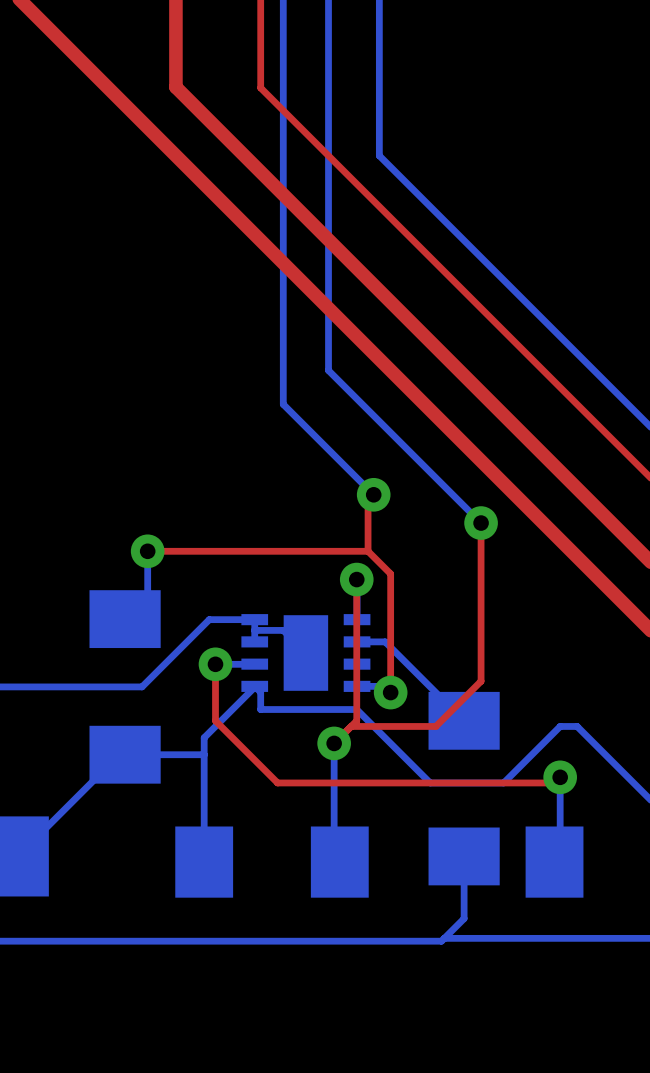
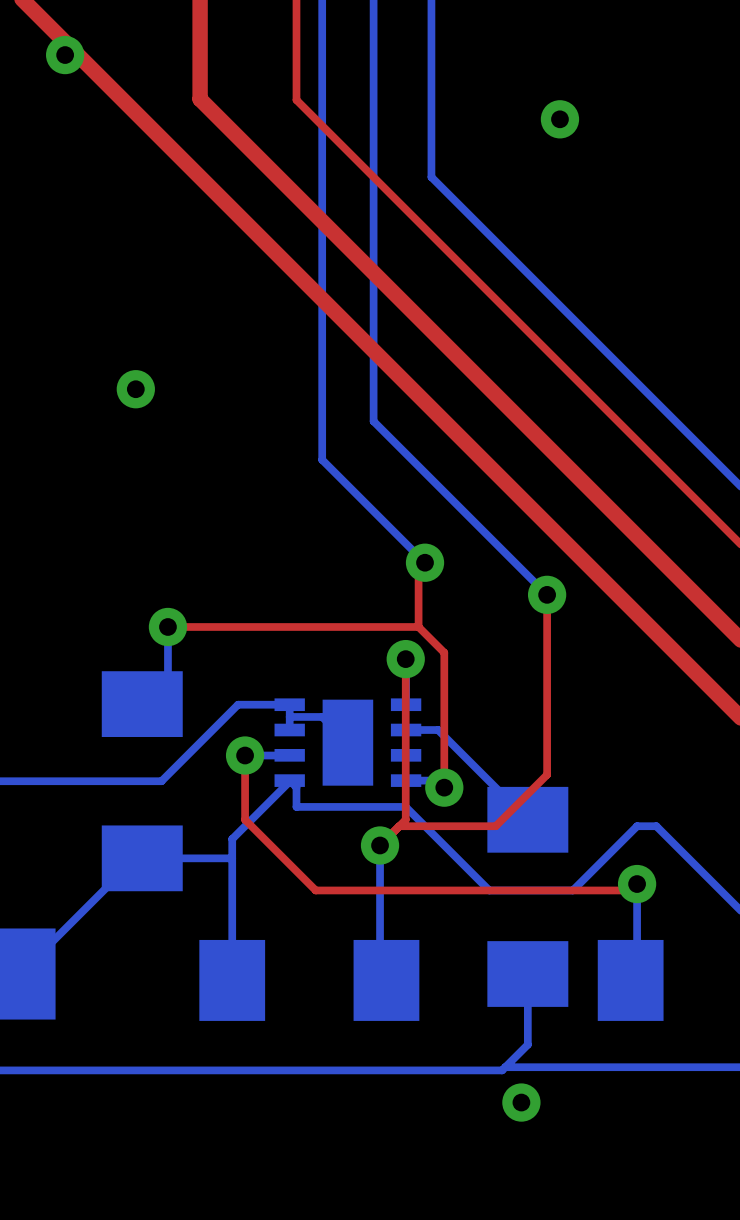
via: none -> (65, 55)
via: none -> (559, 119)
via: none -> (135, 389)
via: none -> (521, 1102)

